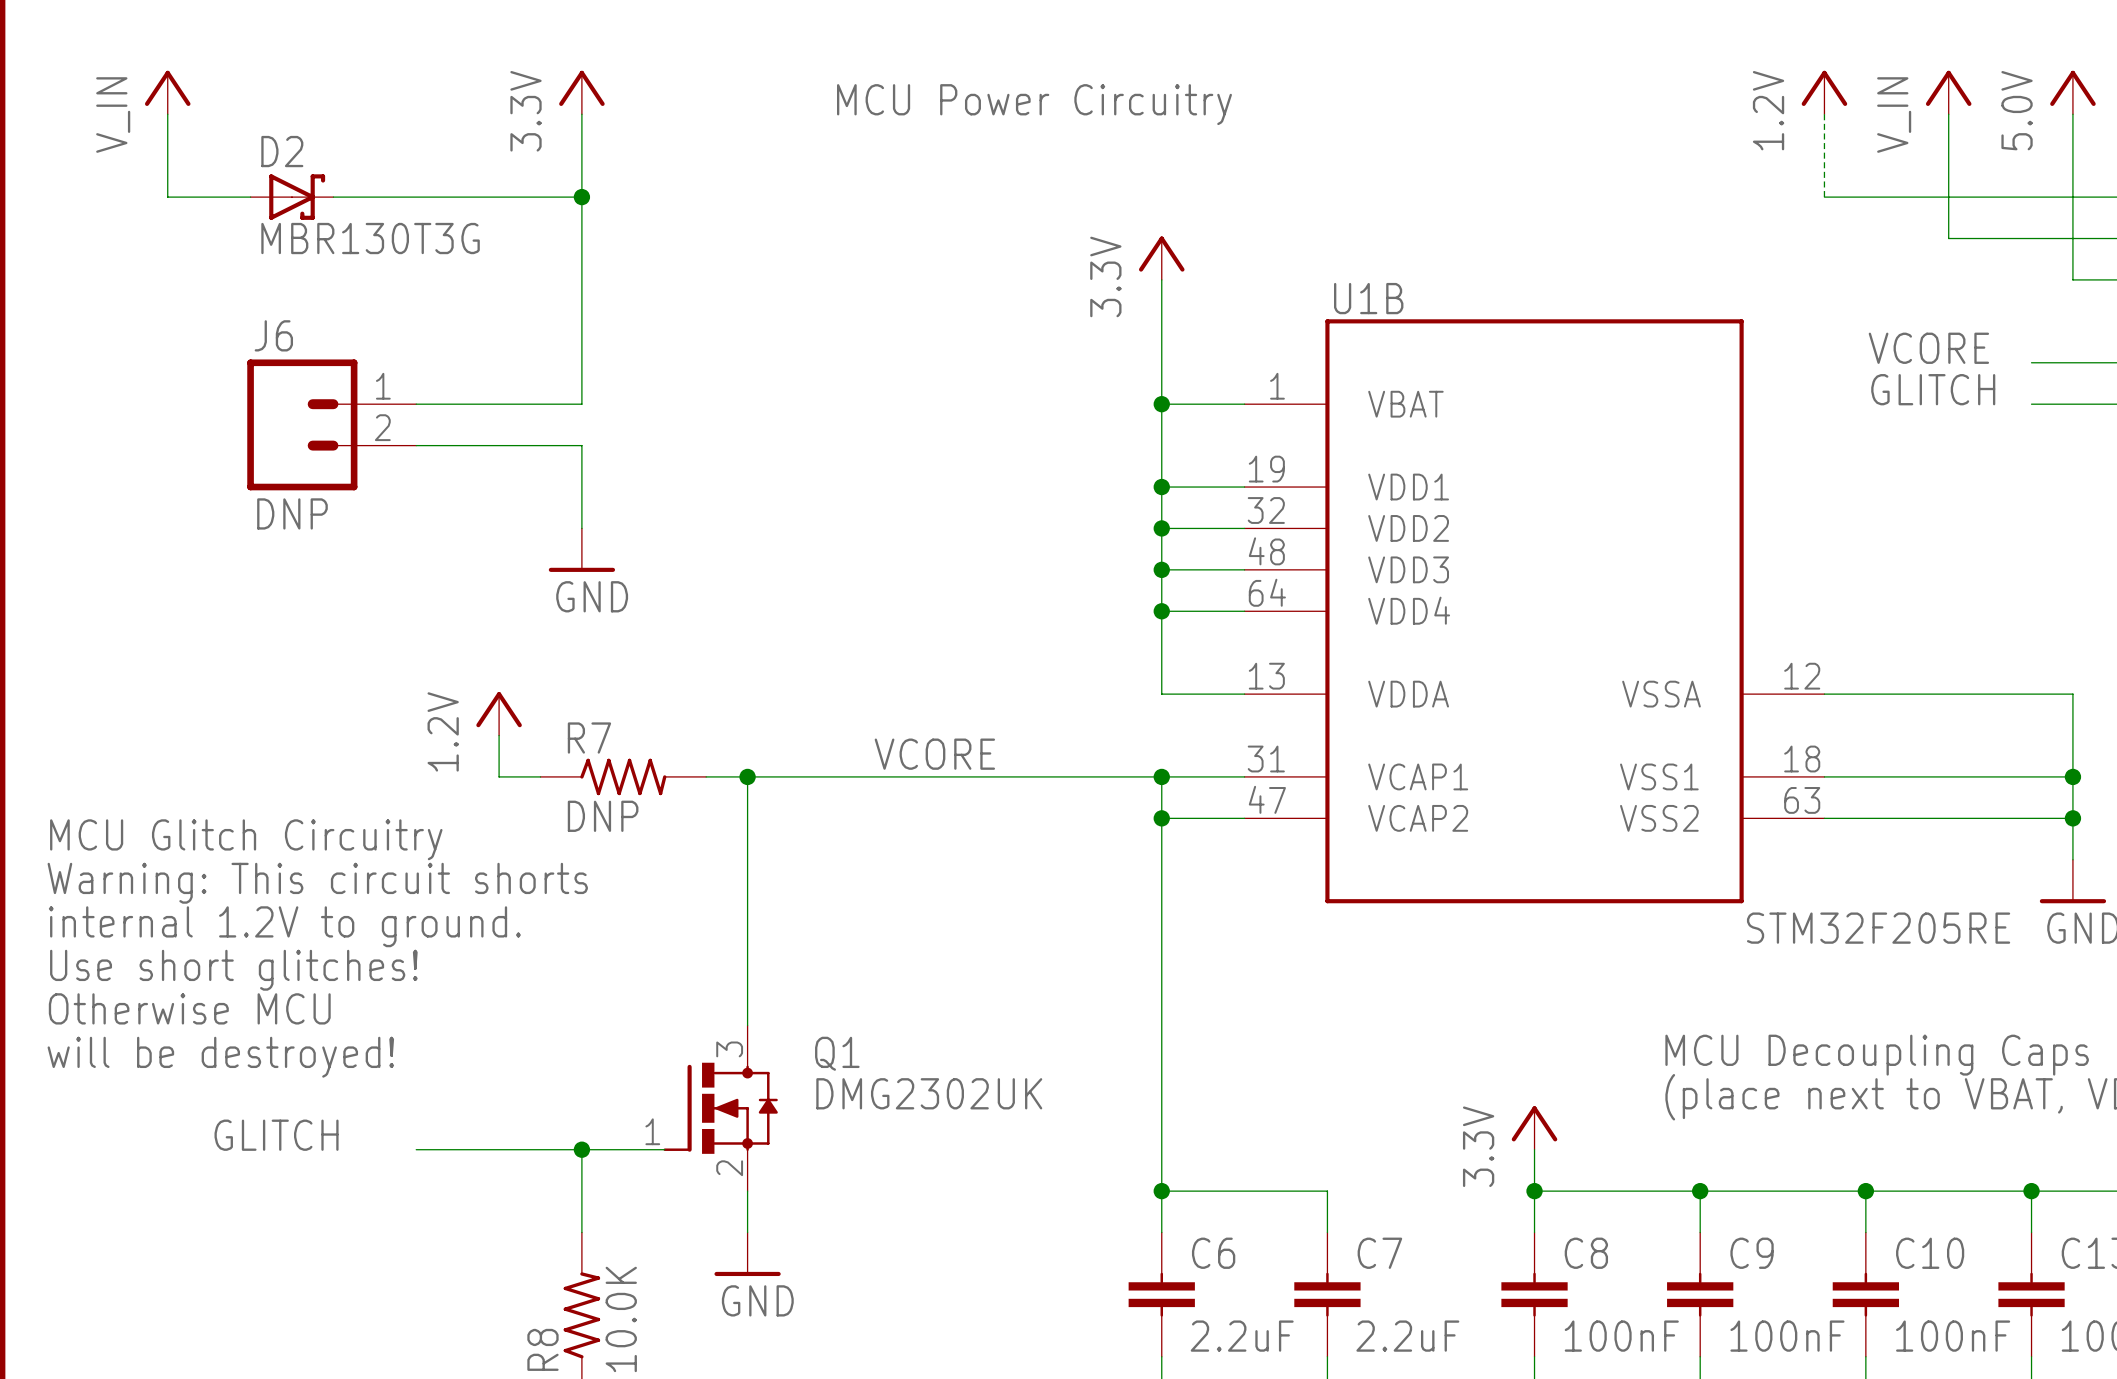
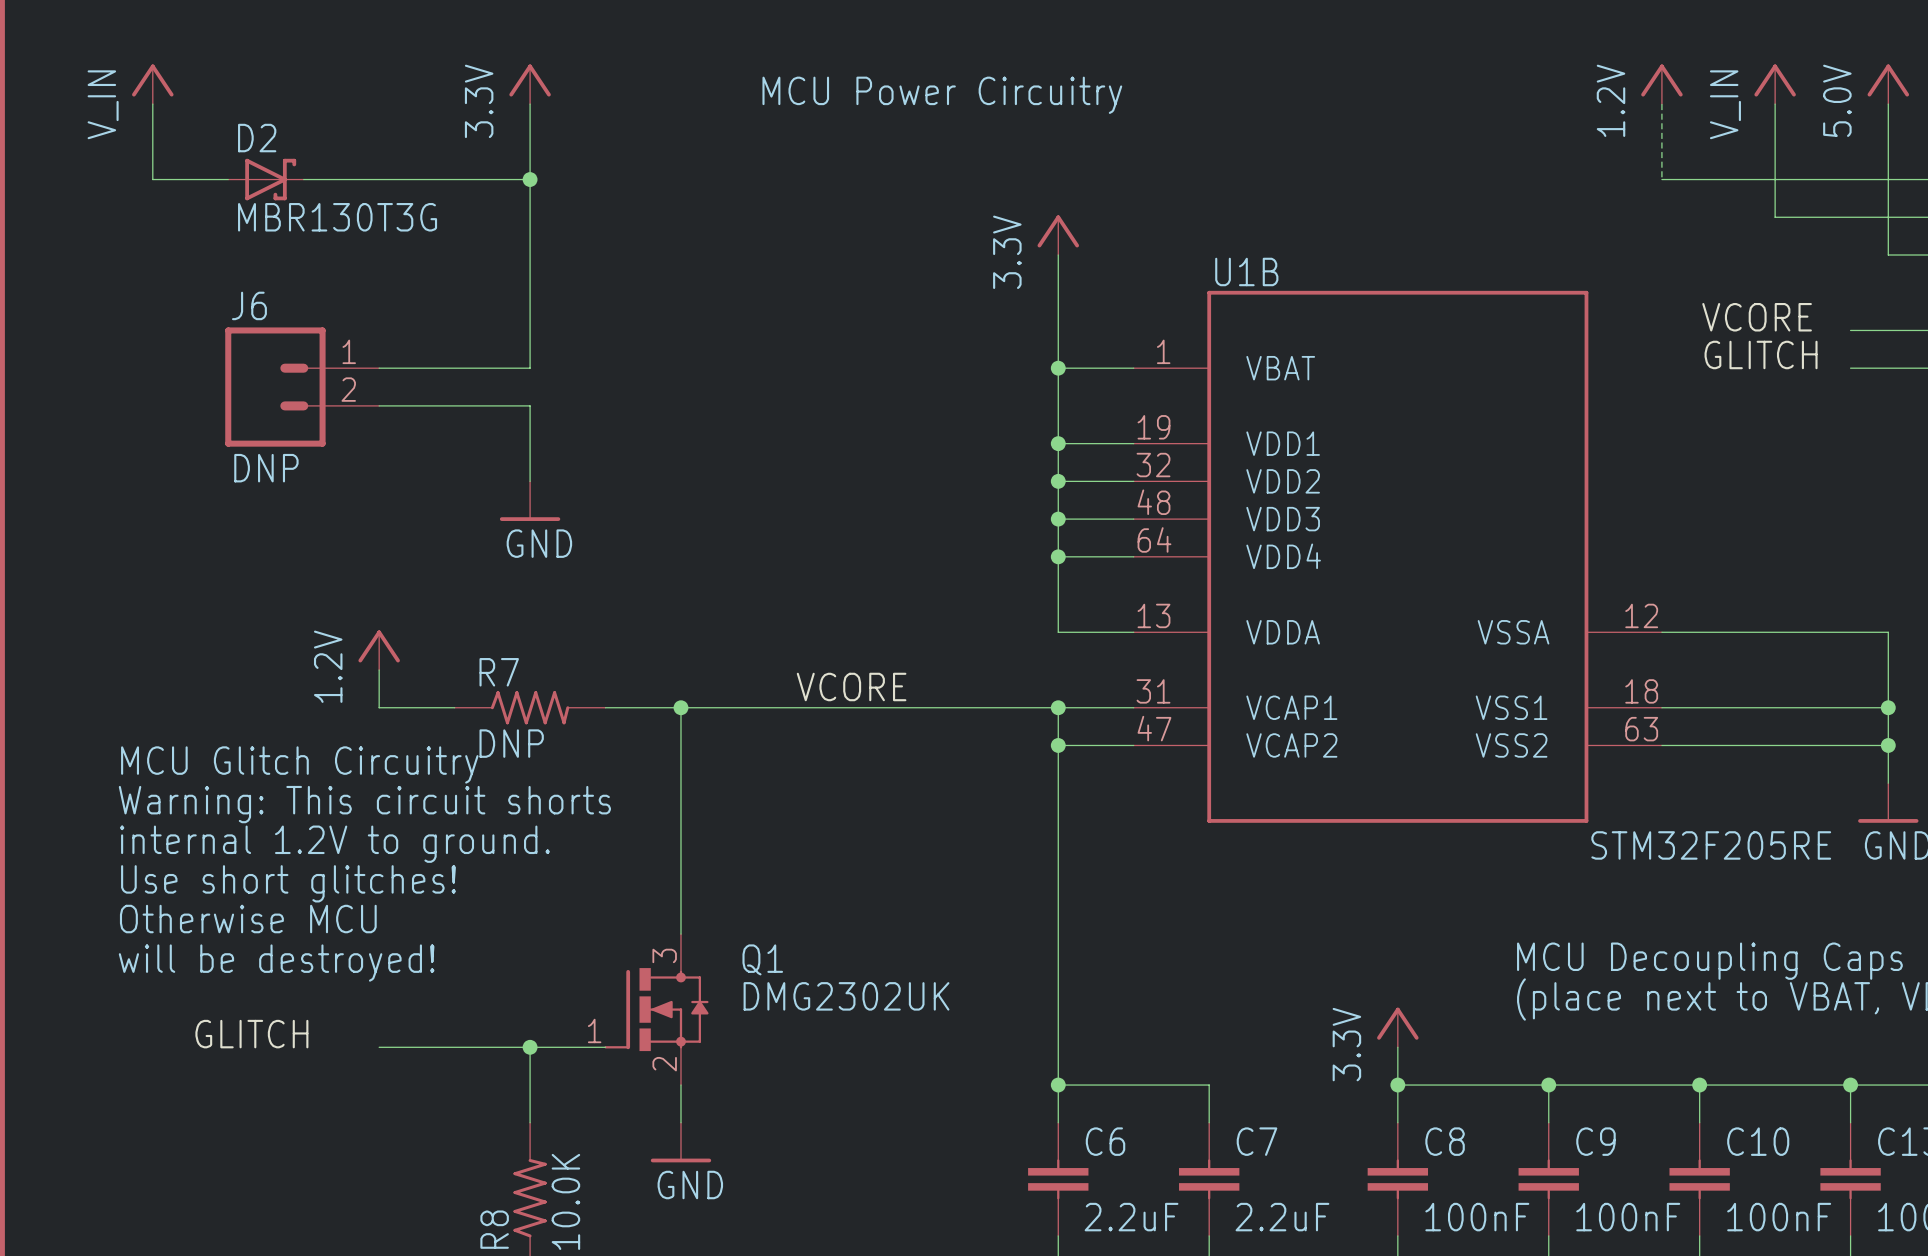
power symbol position: 1.2V (499, 713) -> 1.2V (379, 650)
wire: none -> (379, 670) (379, 707) (454, 707)
wire: (499, 735) (499, 776) (540, 776) -> none
R7 position: (623, 776) -> (530, 707)
text position: MCU Glitch Circuitry (246, 839) -> MCU Glitch Circuitry (299, 764)
text position: Warning: This circuit shorts (317, 883) -> Warning: This circuit shorts (364, 804)
text position: internal 1.2V to ground. (284, 926) -> internal 1.2V to ground. (334, 844)
text position: Use short glitches! (233, 970) -> Use short glitches! (288, 883)
text position: Otherwise MCU (189, 1008) -> Otherwise MCU (248, 919)
text position: will be destroyed! (220, 1057) -> will be destroyed! (276, 963)

